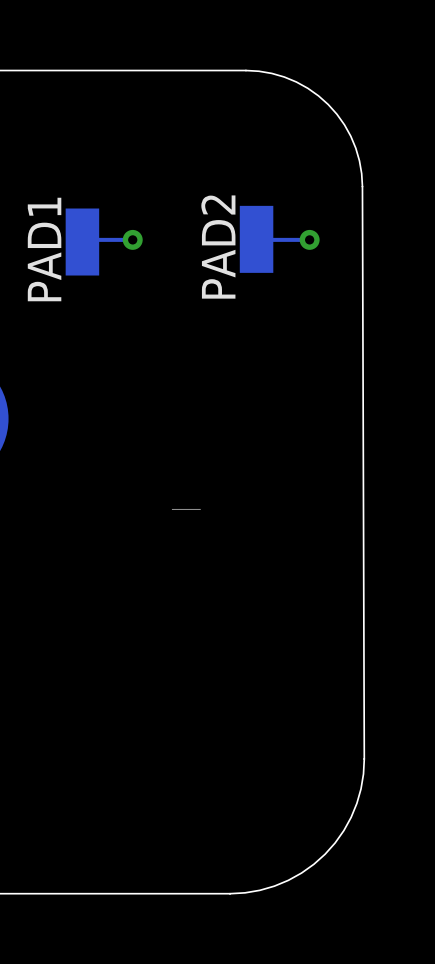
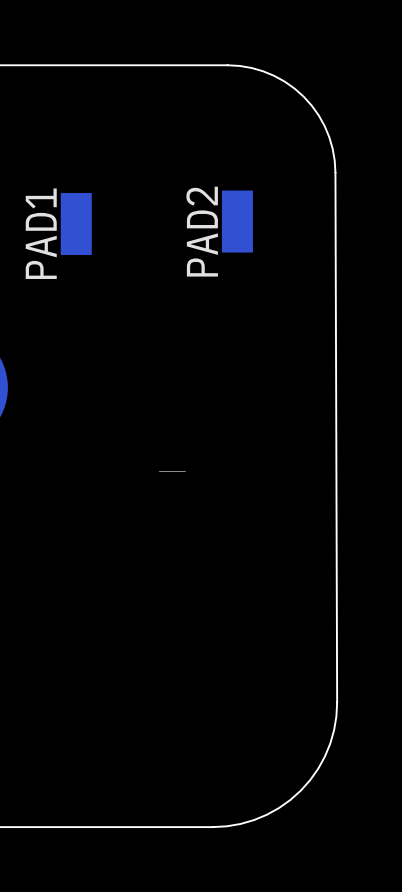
track: (132, 239) (84, 239) (82, 242) -> none
via: (132, 239) -> none
track: (256, 239) (309, 239) -> none
via: (309, 239) -> none

